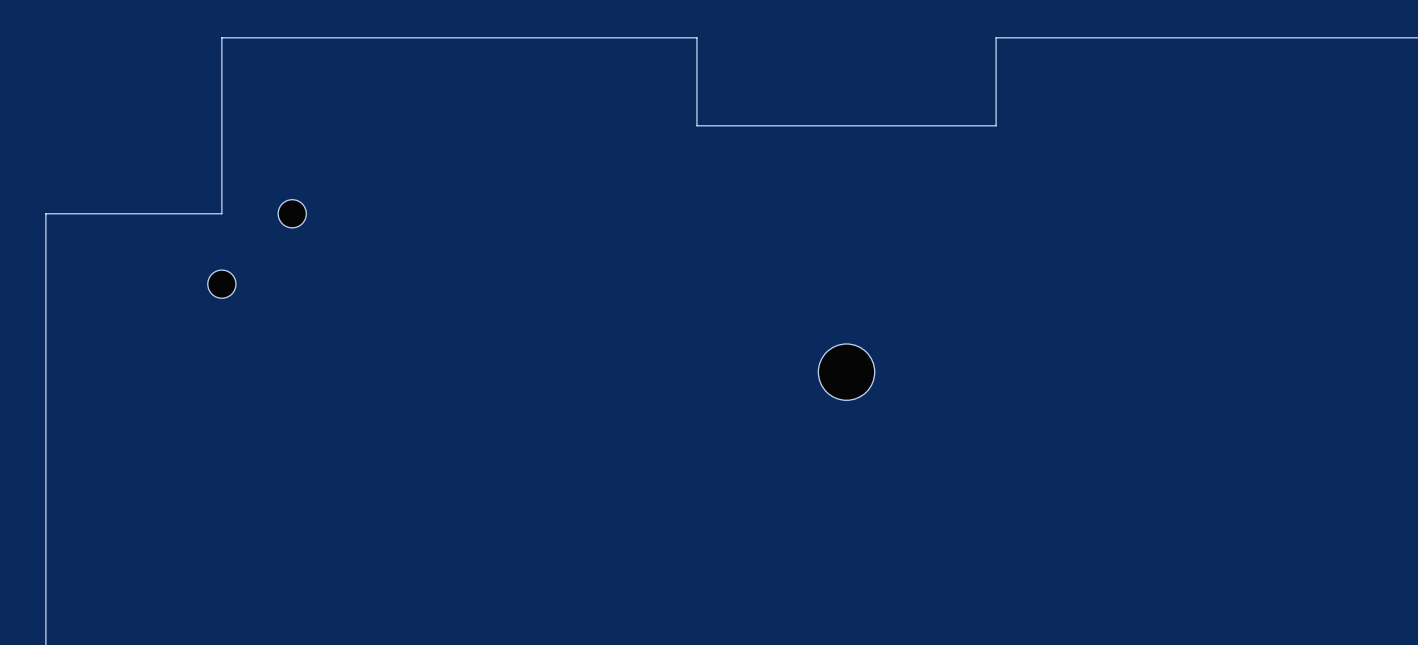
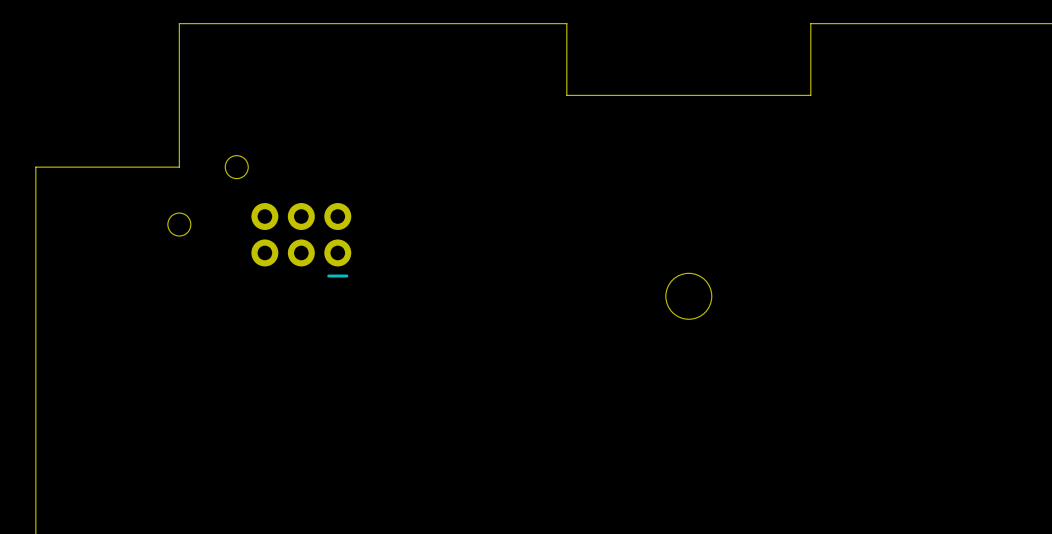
part: none -> (301, 240)

